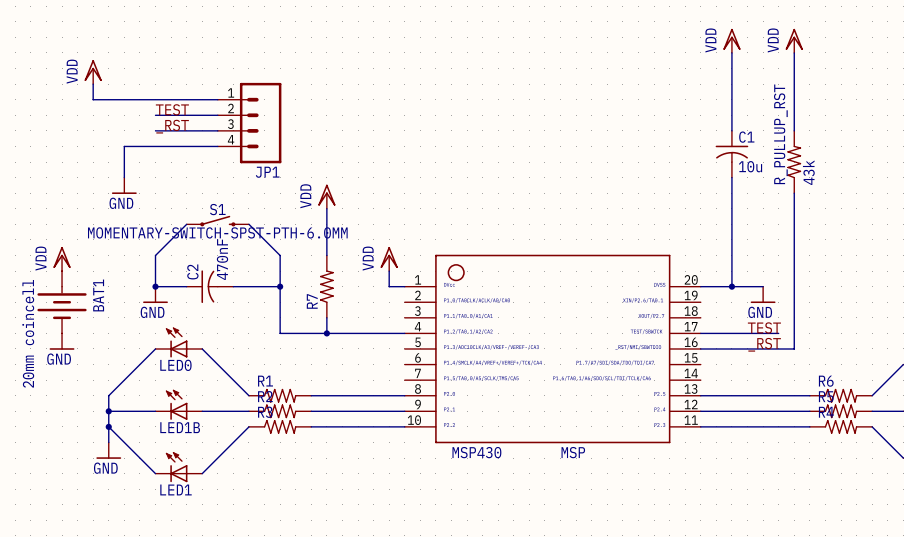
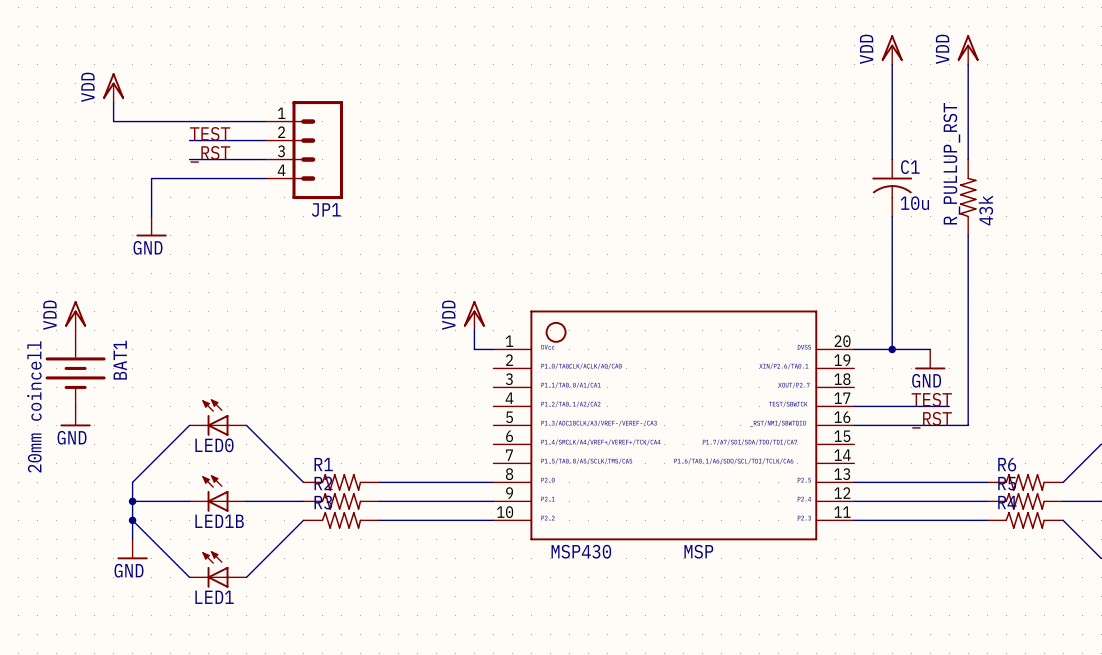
power symbol: VDD (326, 196) -> none
wire: (326, 208) (326, 255) -> none
S1: MOMENTARY-SWITCH-SPST-PTH-6.0MM (217, 221) -> none
wire: (186, 224) (155, 255) (155, 286) (186, 286) -> none
wire: (248, 224) (280, 255) (280, 333) (404, 333) -> none
junction: (155, 286) -> none
C2: 470nF (210, 286) -> none
wire: (233, 286) (280, 286) -> none
junction: (280, 286) -> none
R7: (326, 286) -> none
power symbol: GND (155, 294) -> none
wire: (326, 317) (326, 333) -> none
junction: (326, 333) -> none

